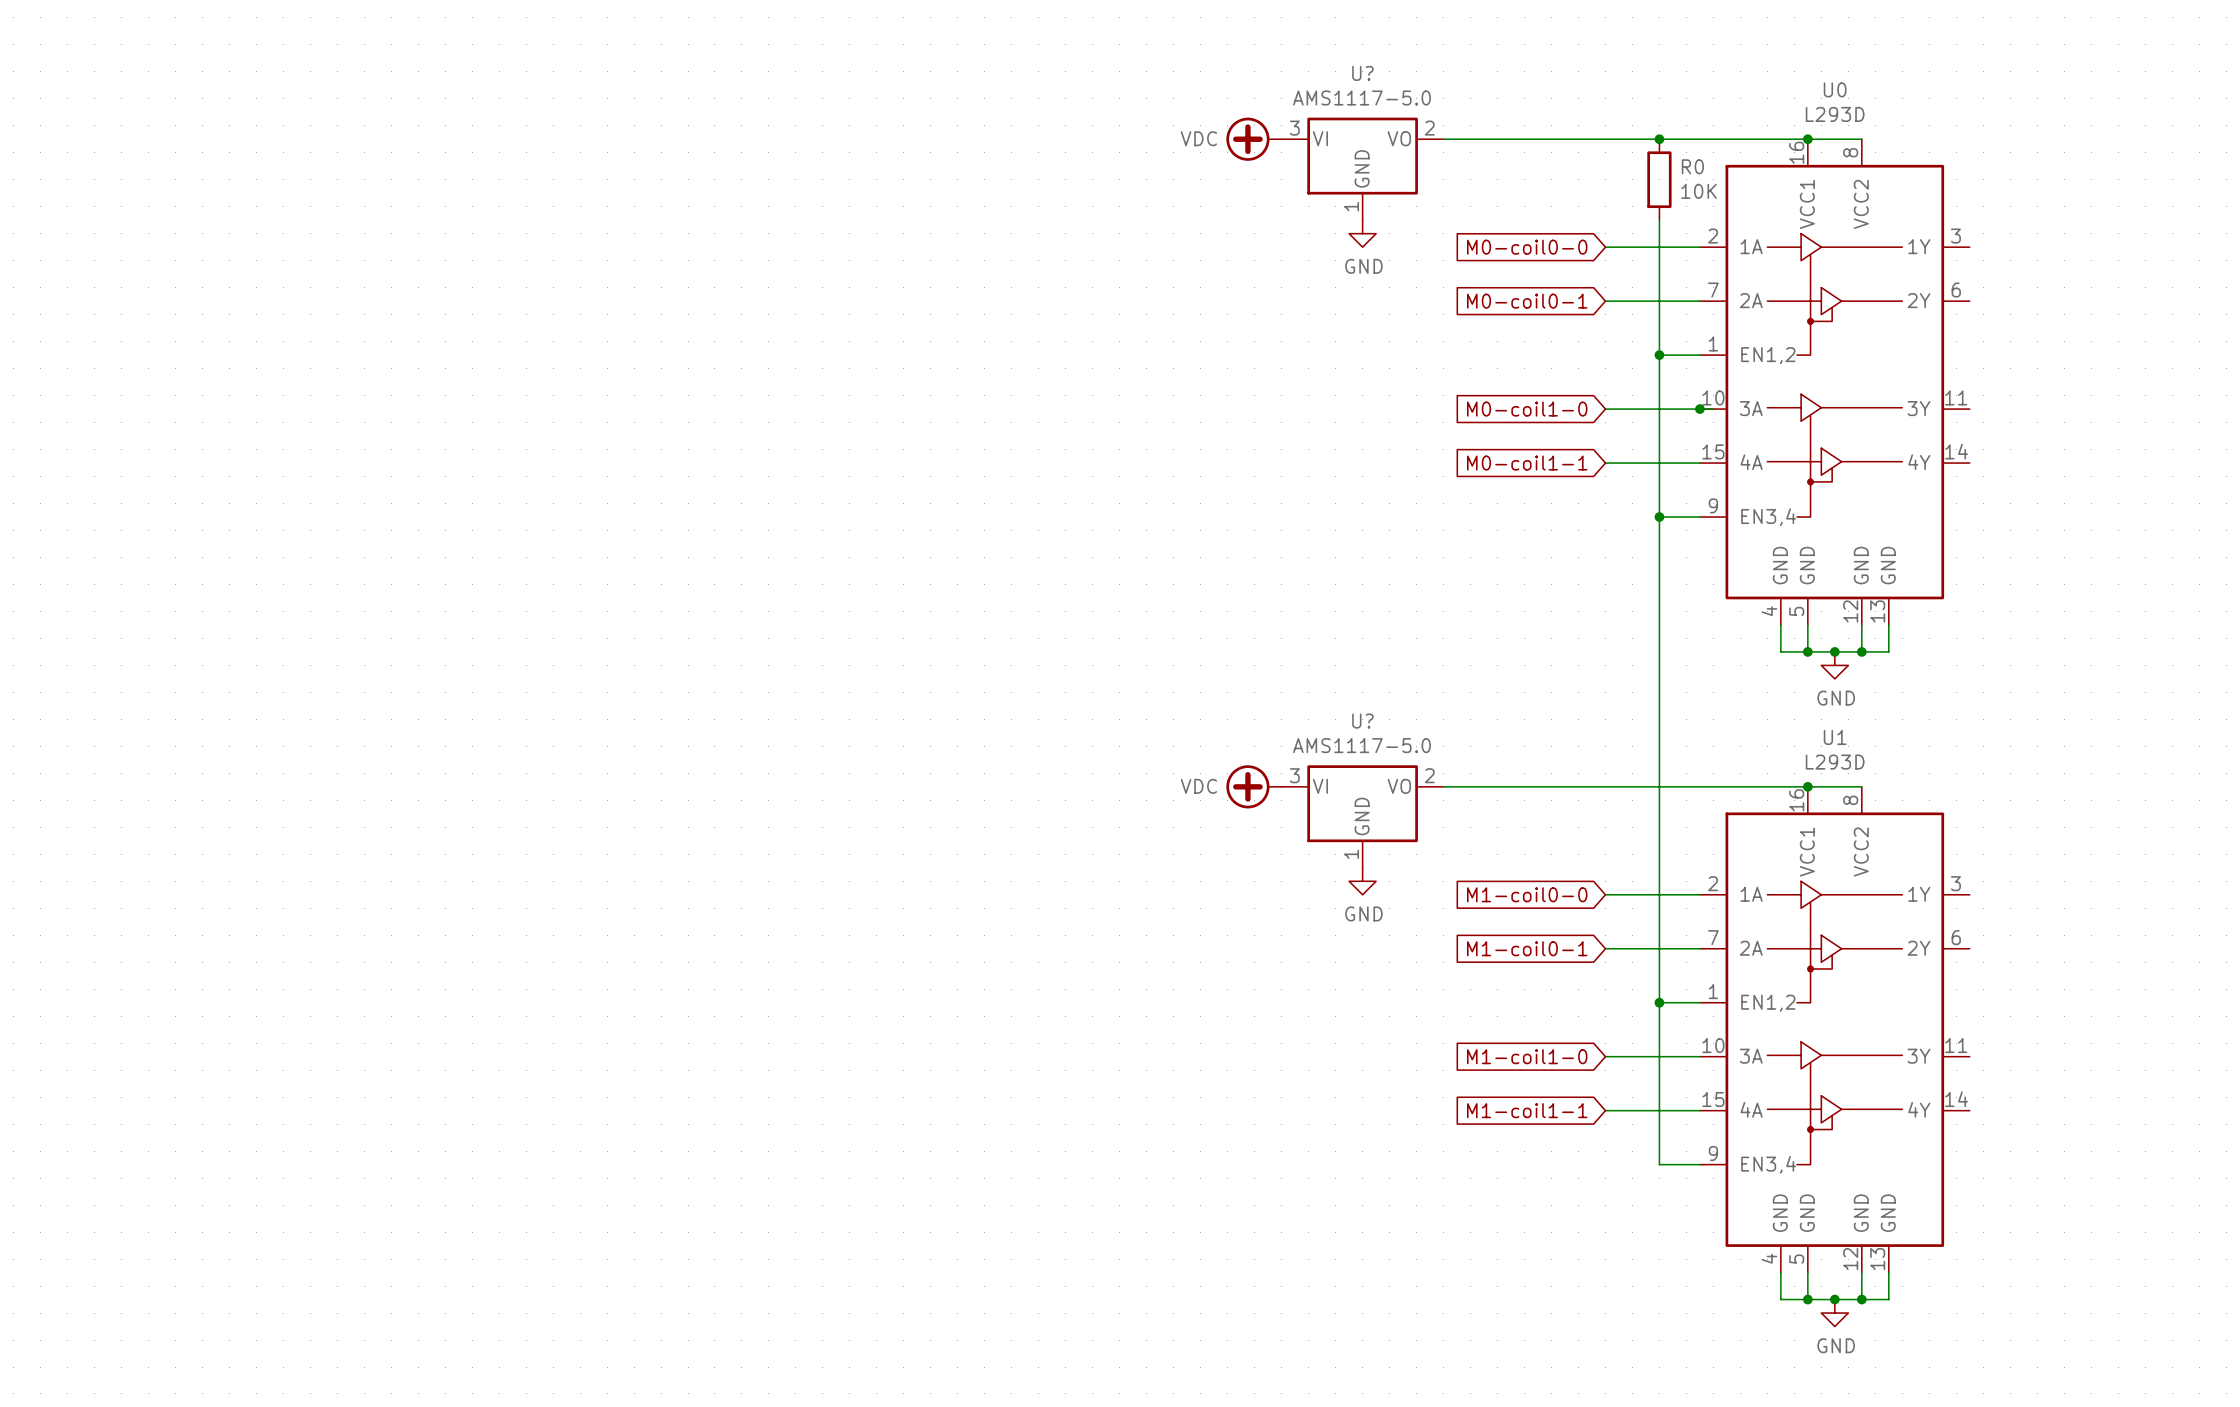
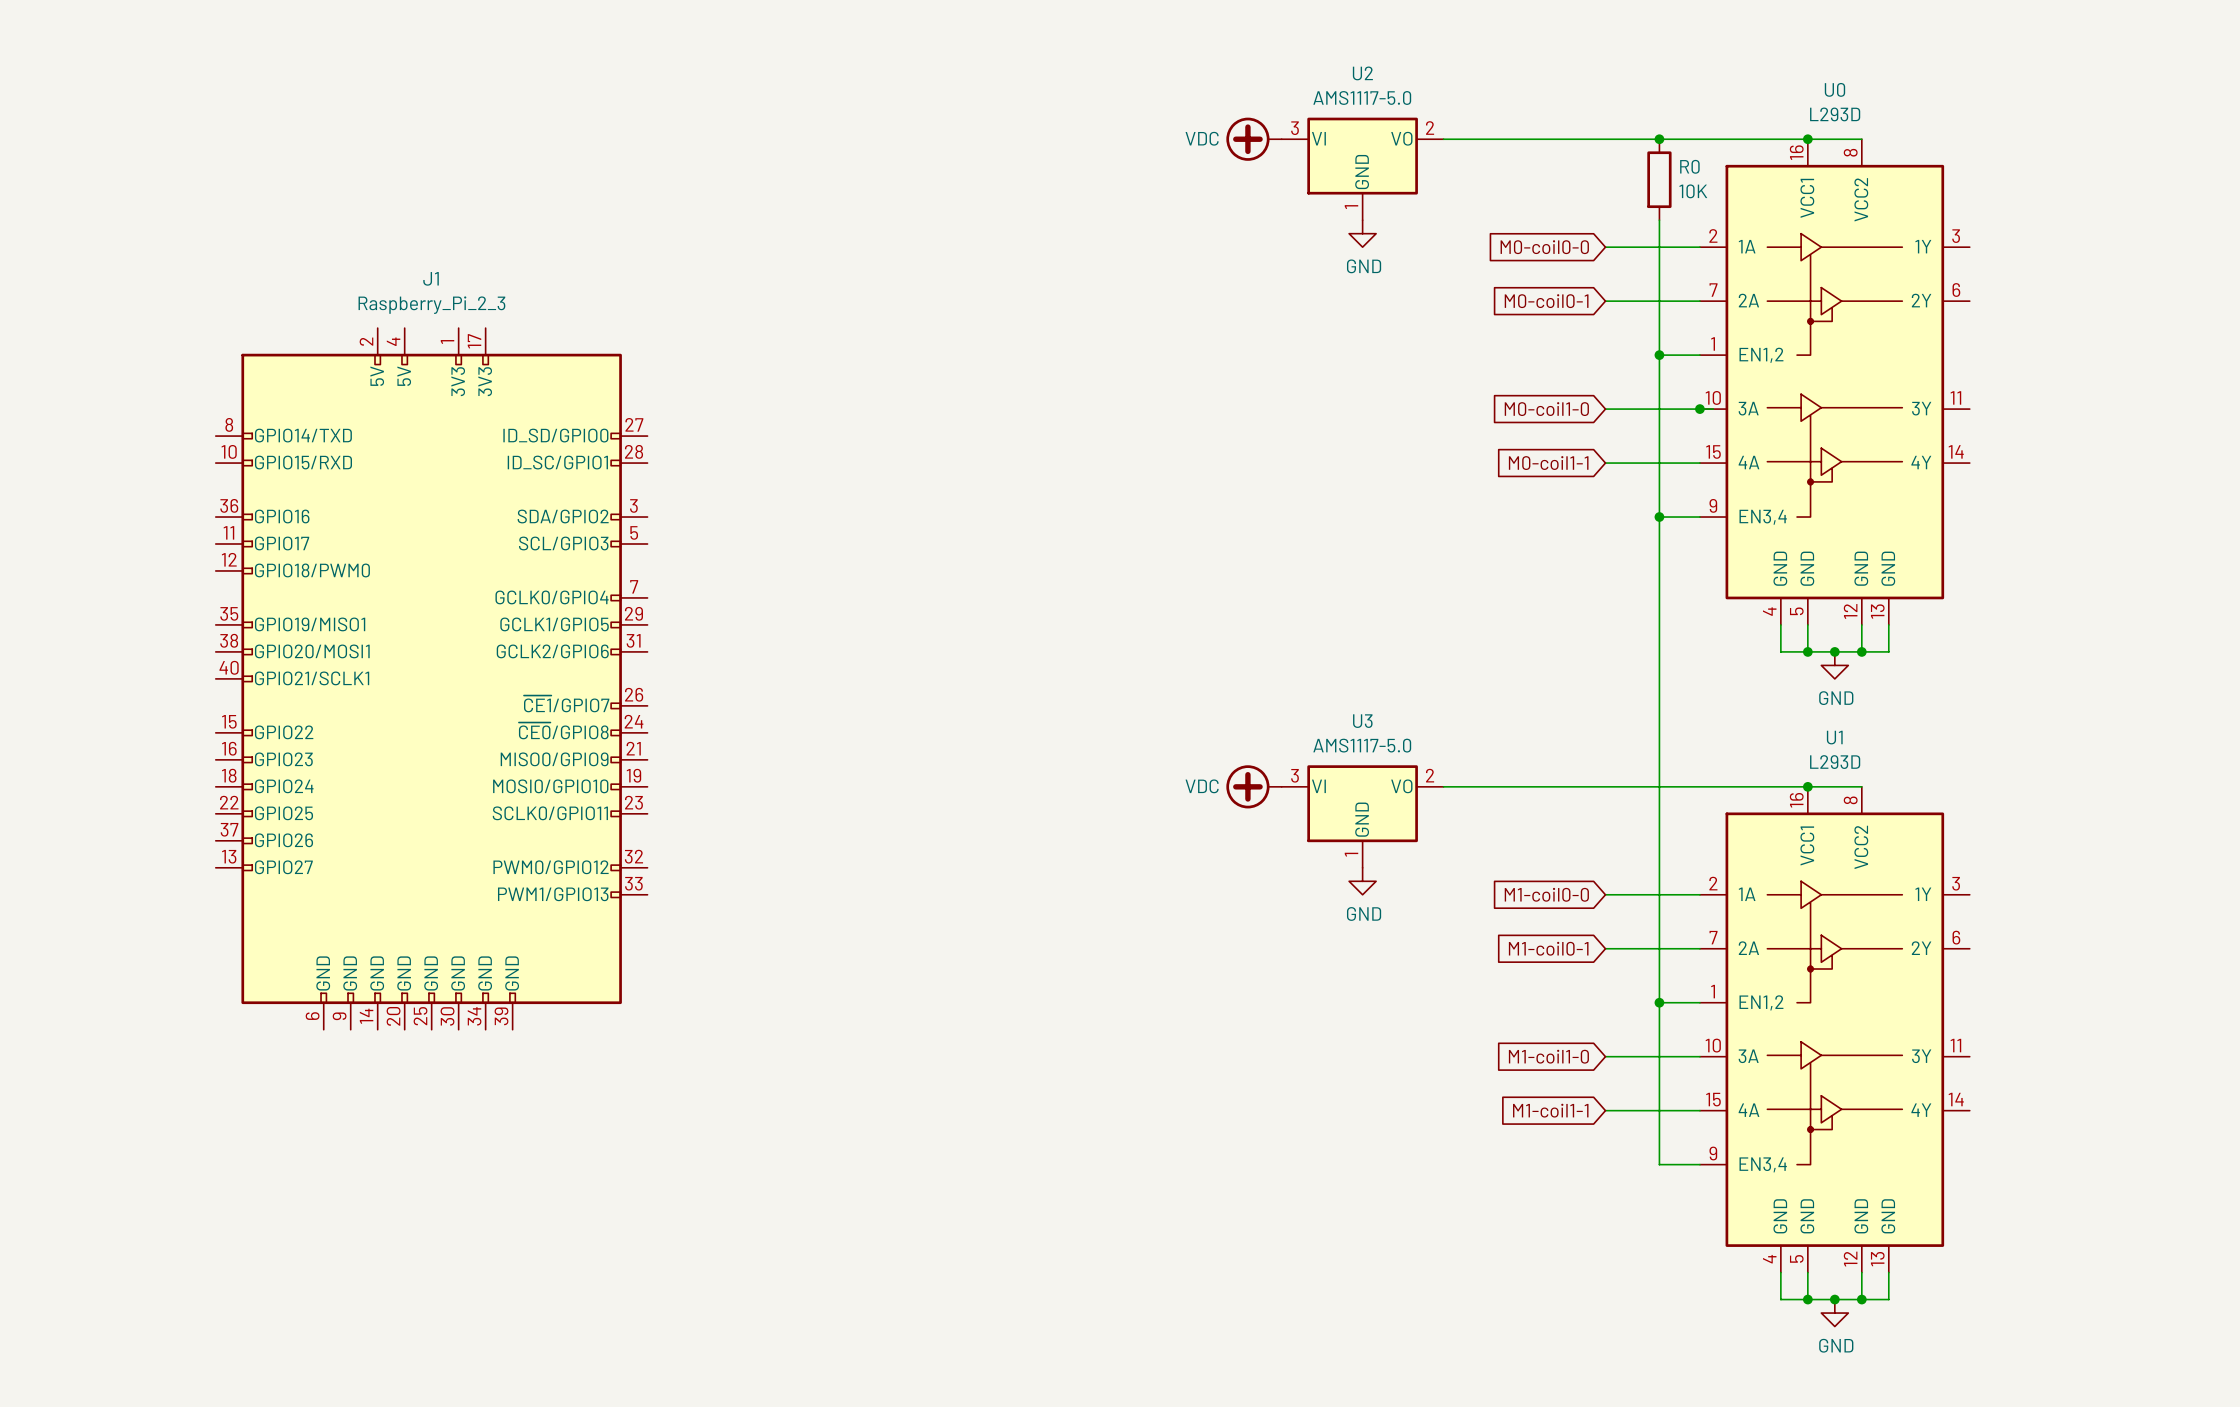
U? name: U? (1362, 73) -> U2 (1362, 73)
J1: none -> Raspberry_Pi_2_3 (431, 678)
U? name: U? (1362, 721) -> U3 (1362, 721)

